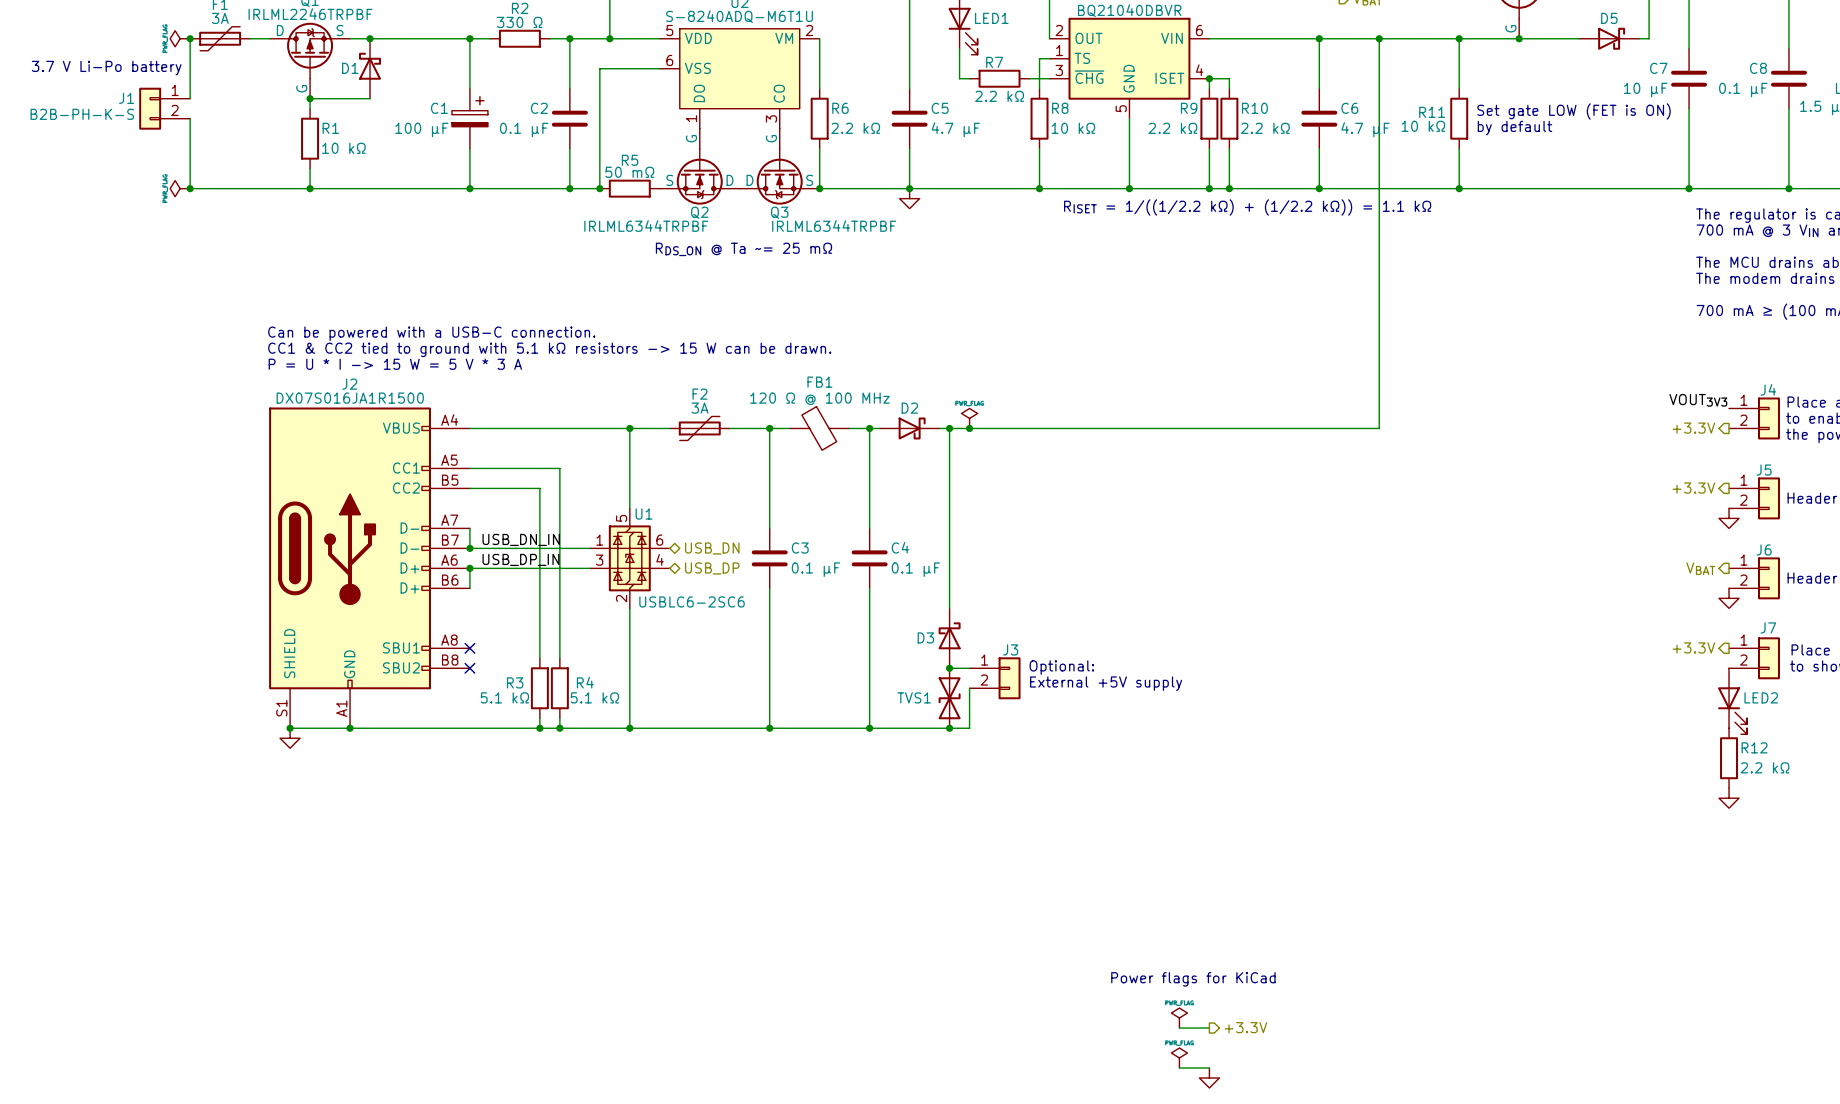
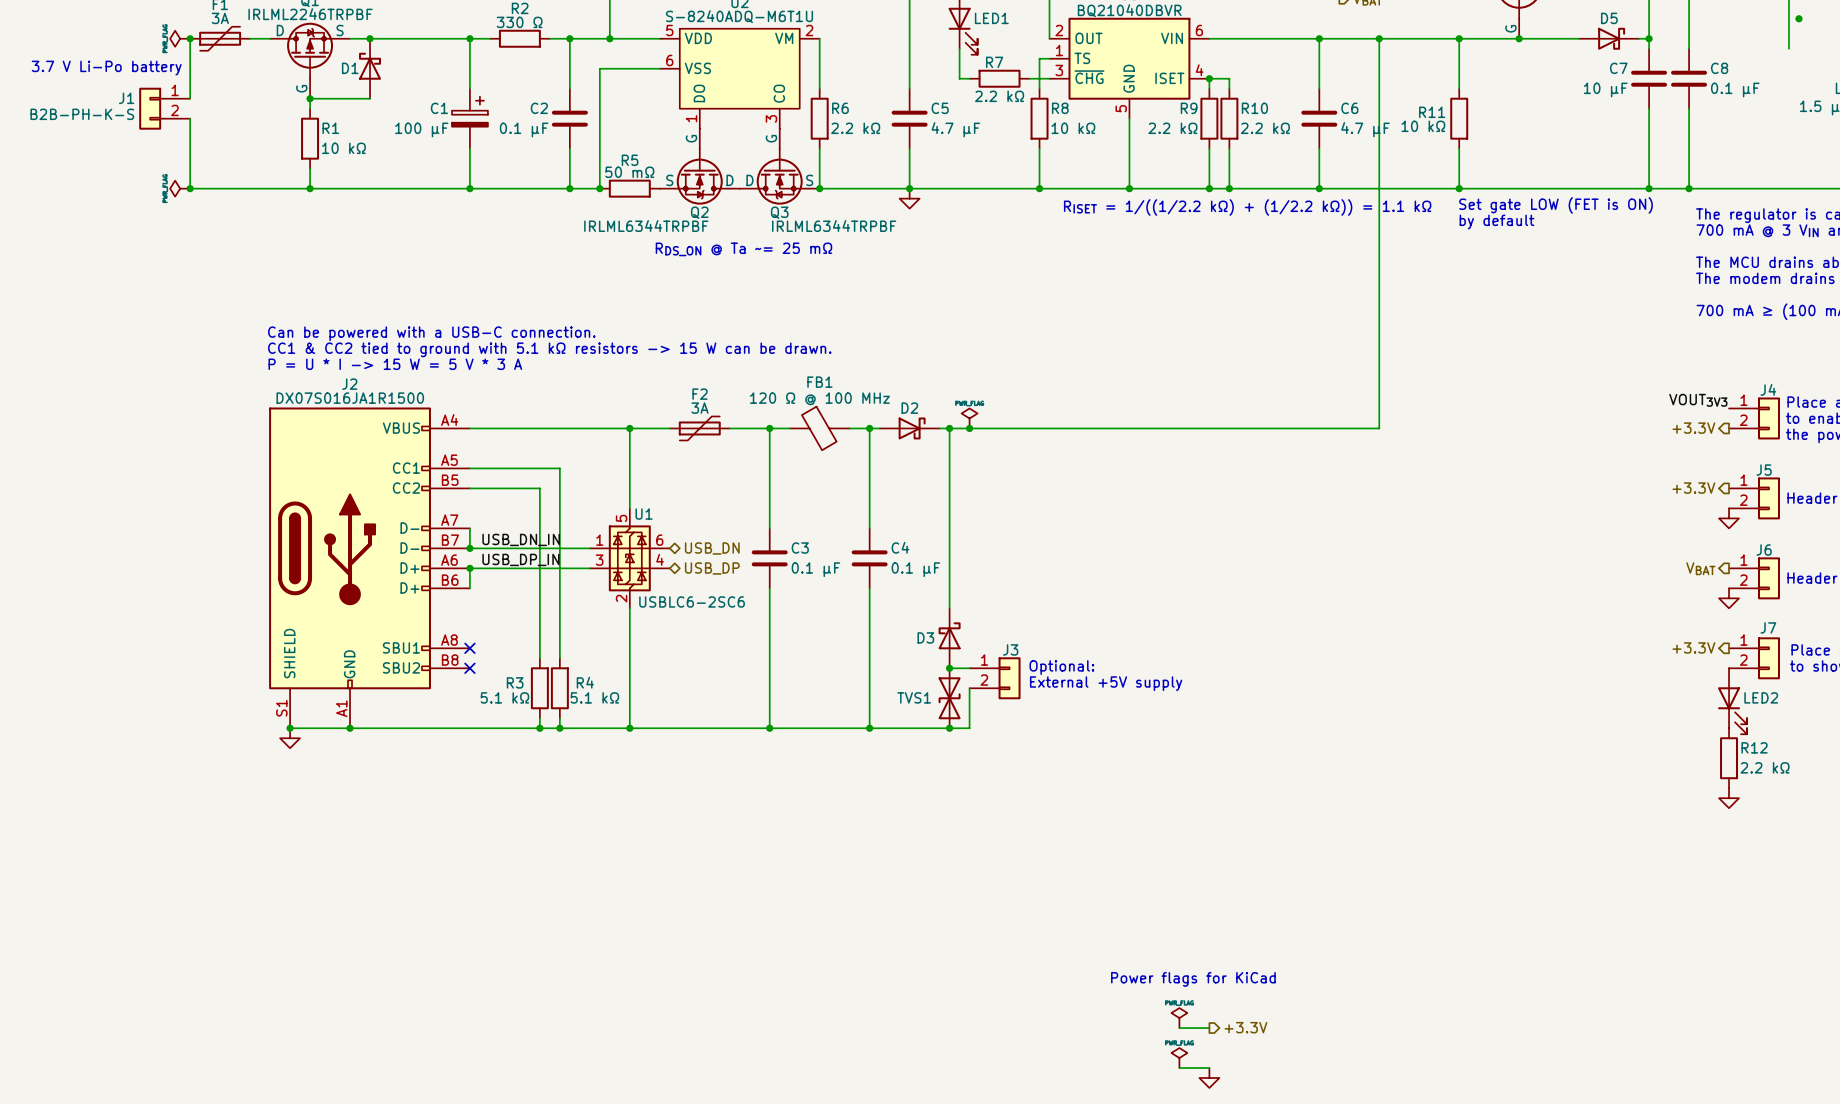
junction: none -> (1798, 18)
wire: none -> (1649, 38) (1649, 48)
junction: none -> (1649, 38)
C7 name: C7 (1658, 68) -> C8 (1719, 68)
C7: none -> 10 µF (1649, 78)
C8: 0.1 µF (1788, 78) -> none
C7 value: 10 µF (1645, 90) -> 0.1 µF (1735, 90)
wire: (1788, 108) (1788, 188) -> (1649, 108) (1649, 188)
text position: Set gate LOW (FET is ON) (1574, 111) -> Set gate LOW (FET is ON) (1556, 205)
text position: by default (1515, 128) -> by default (1497, 221)
junction: none -> (1649, 188)
junction: (1788, 188) -> none

